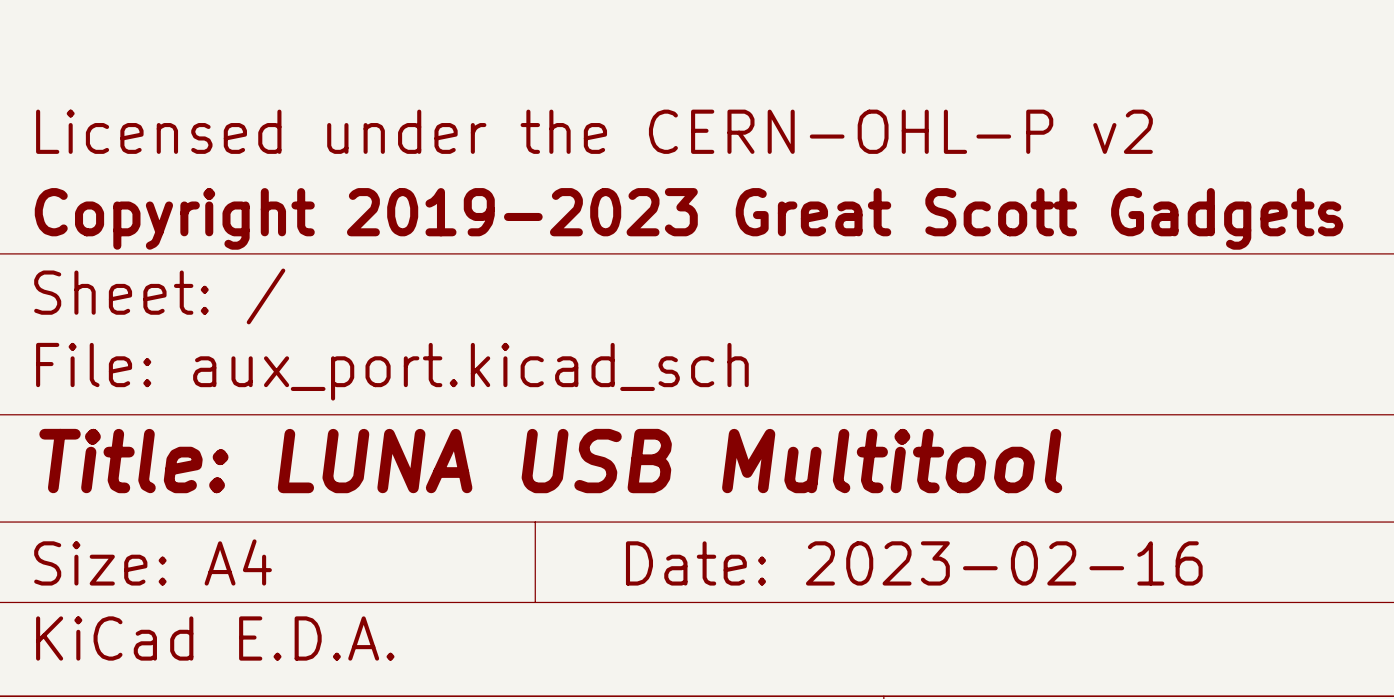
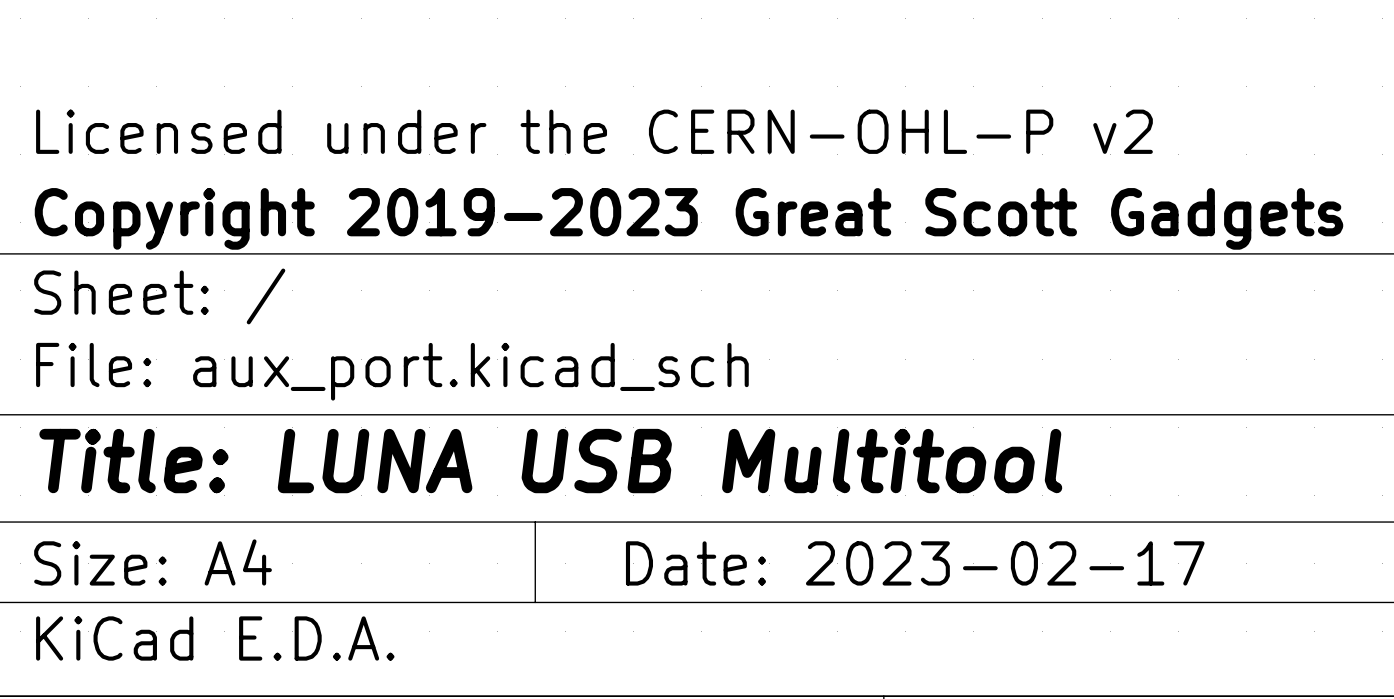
title block: Date: 2023-02-16 (914, 563) -> Date: 2023-02-17 (915, 563)

